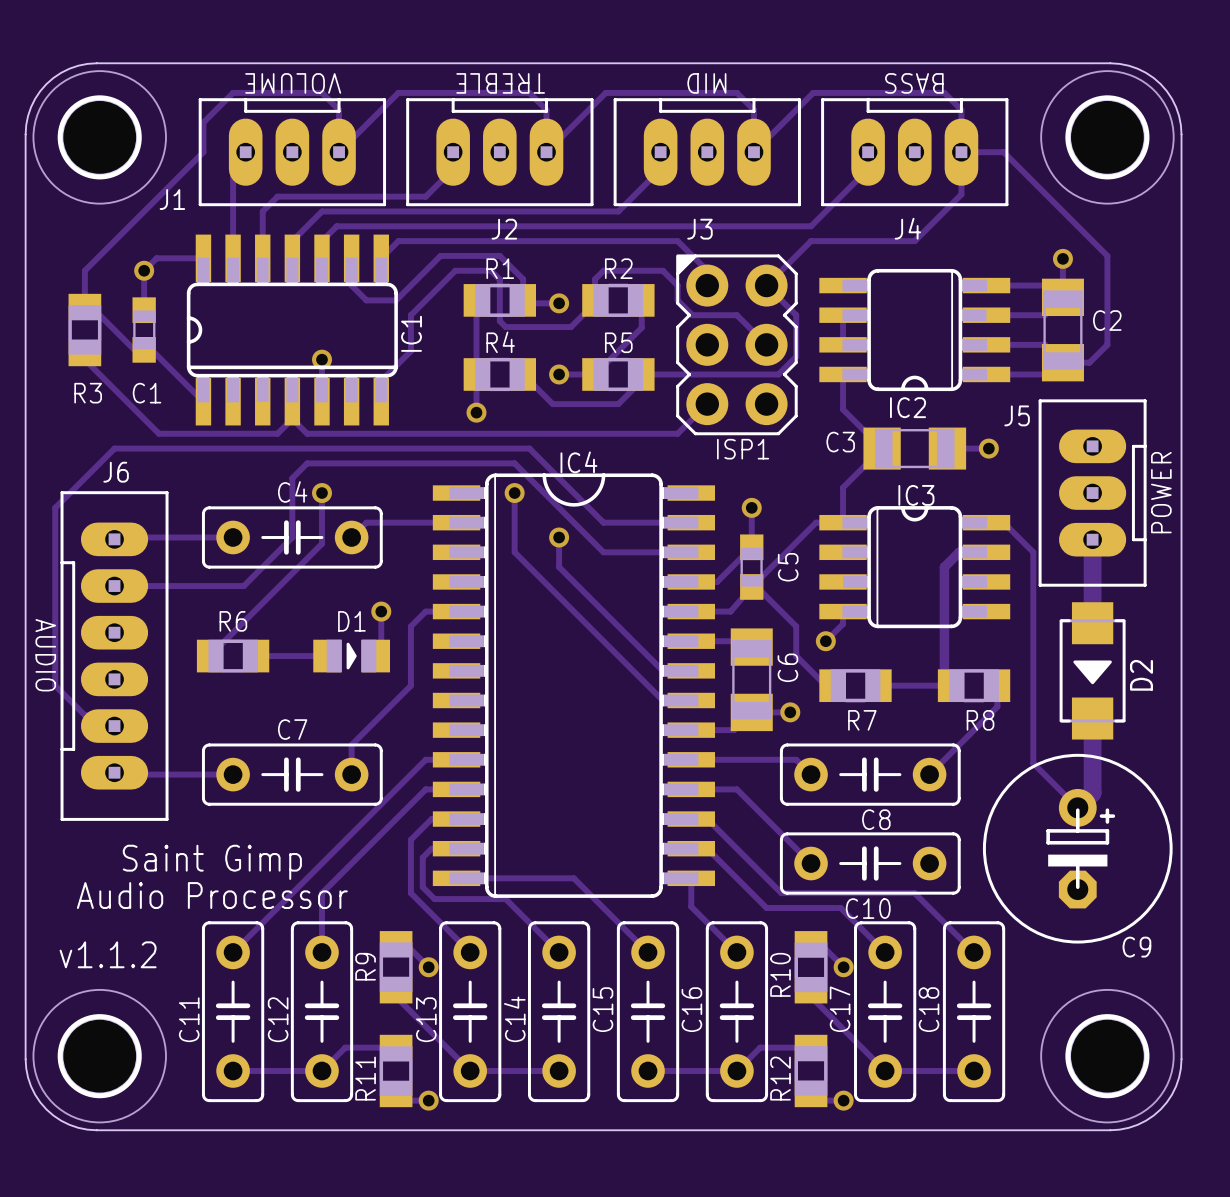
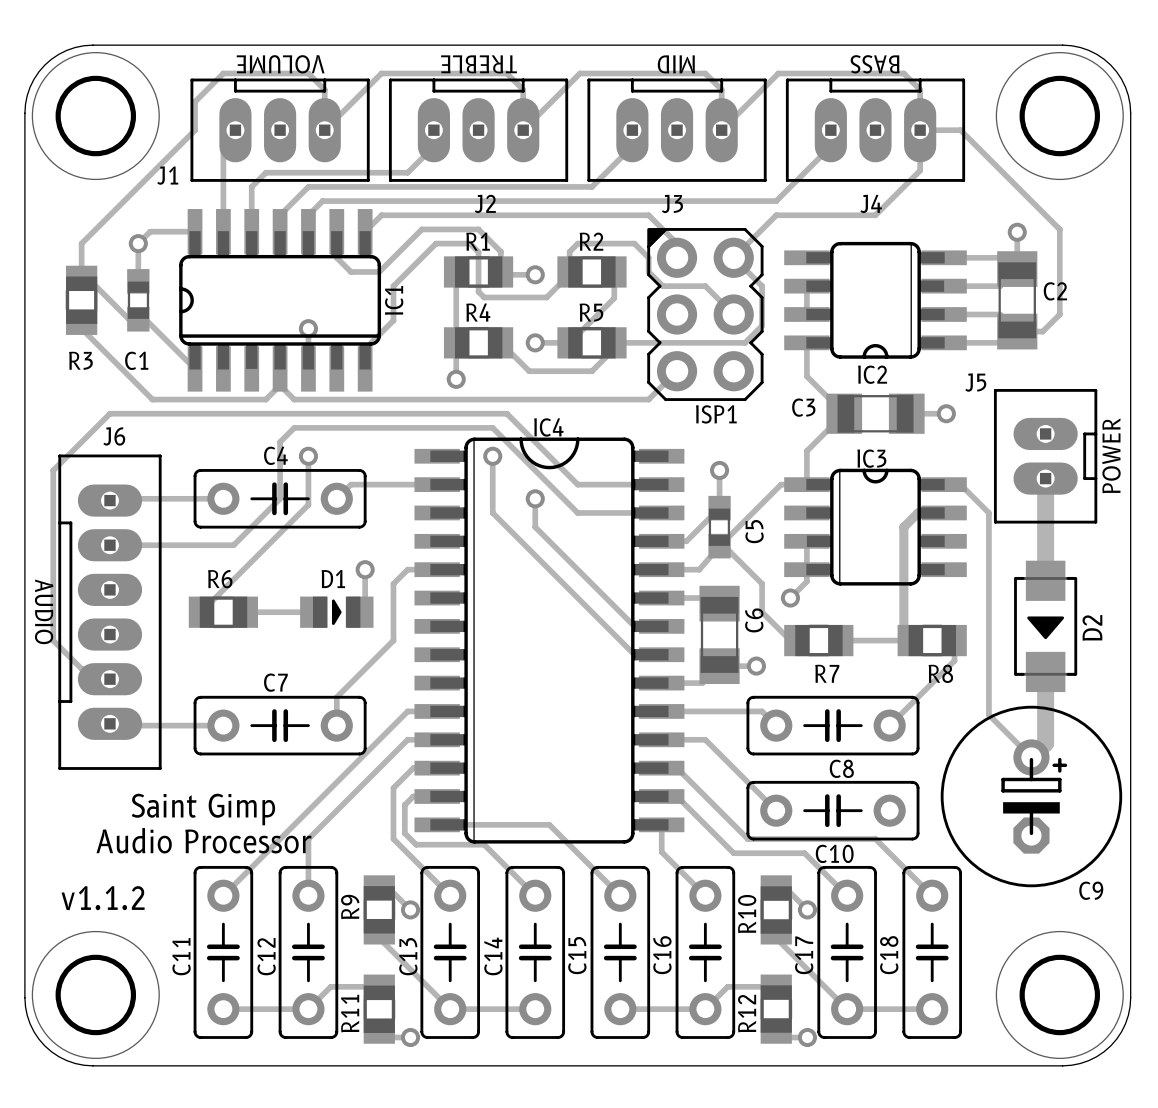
J5 footprint: [1038, 399, 1147, 587] -> [993, 388, 1098, 524]
track: none -> (806, 541) (806, 569)

